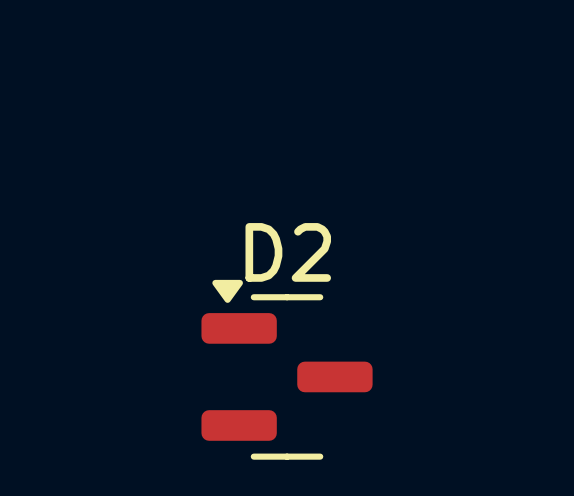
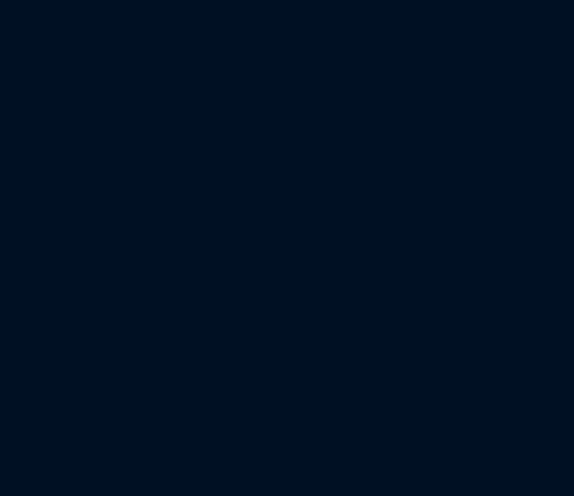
D2: (287, 369) -> none

